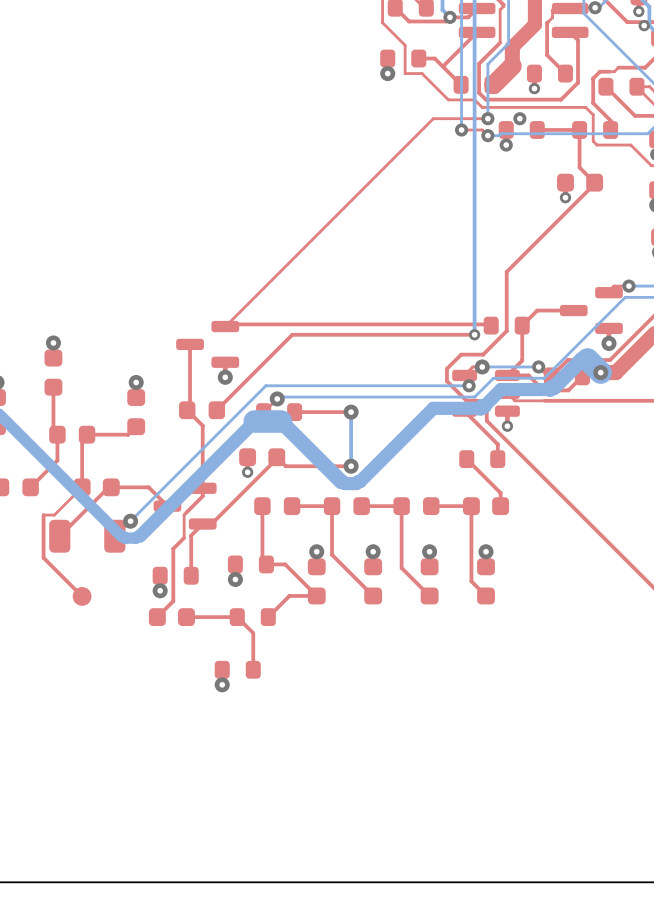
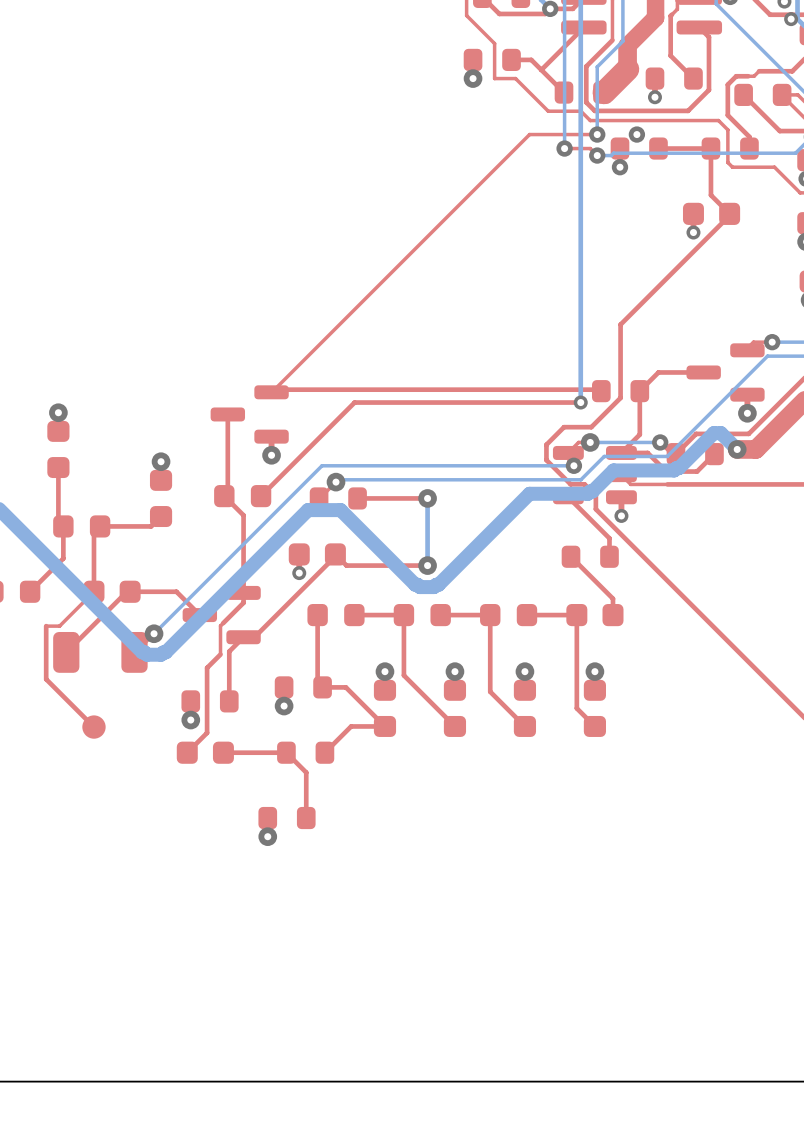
bottom track width: thick (600, 372) (587, 359) (581, 359) (549, 389) (501, 389) (480, 408) (433, 408) (356, 483) (341, 481) (281, 421) (254, 421) (139, 536) -> thin (737, 449) (720, 433) (713, 433) (674, 470) (613, 470) (587, 493) (529, 493) (438, 584) (433, 587) (419, 587) (415, 584) (340, 510) (308, 510) (165, 652)

